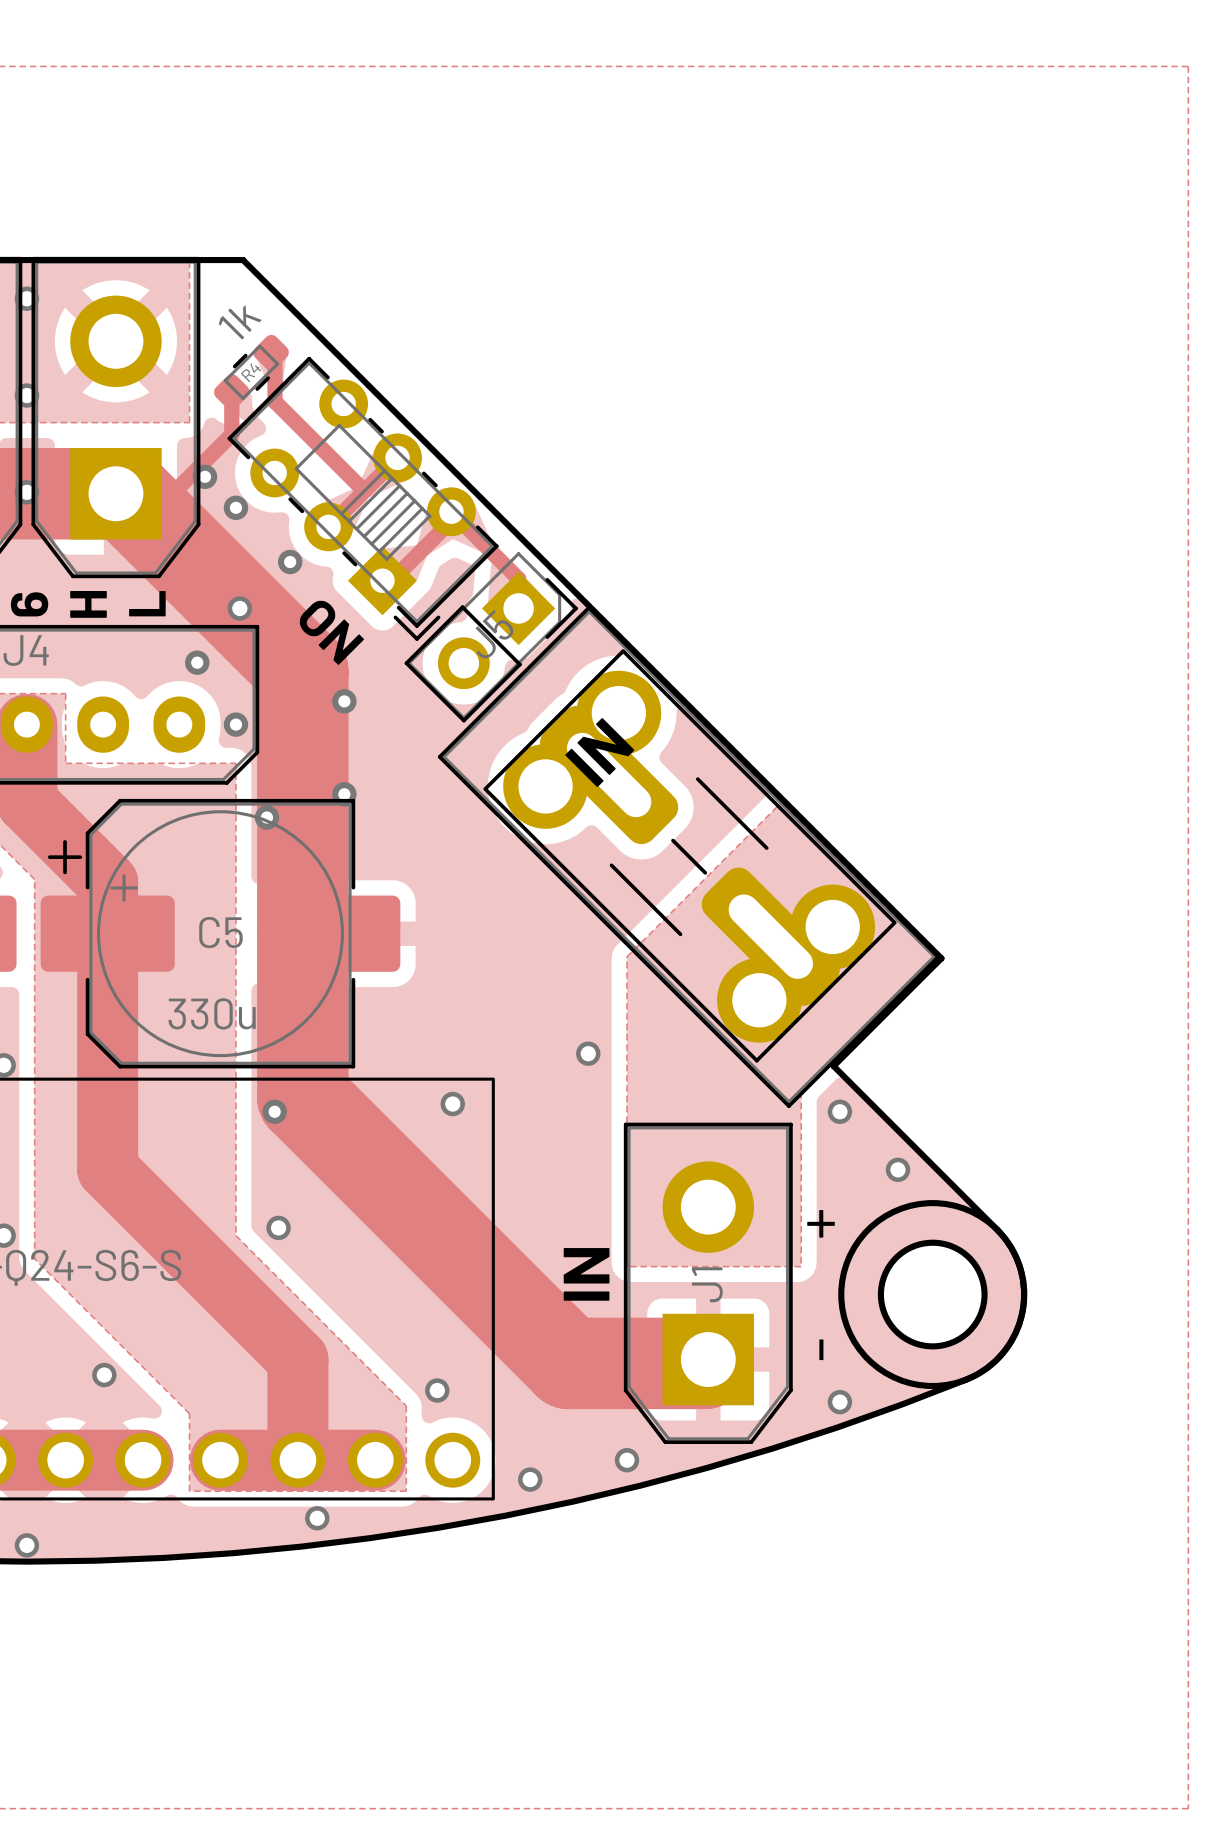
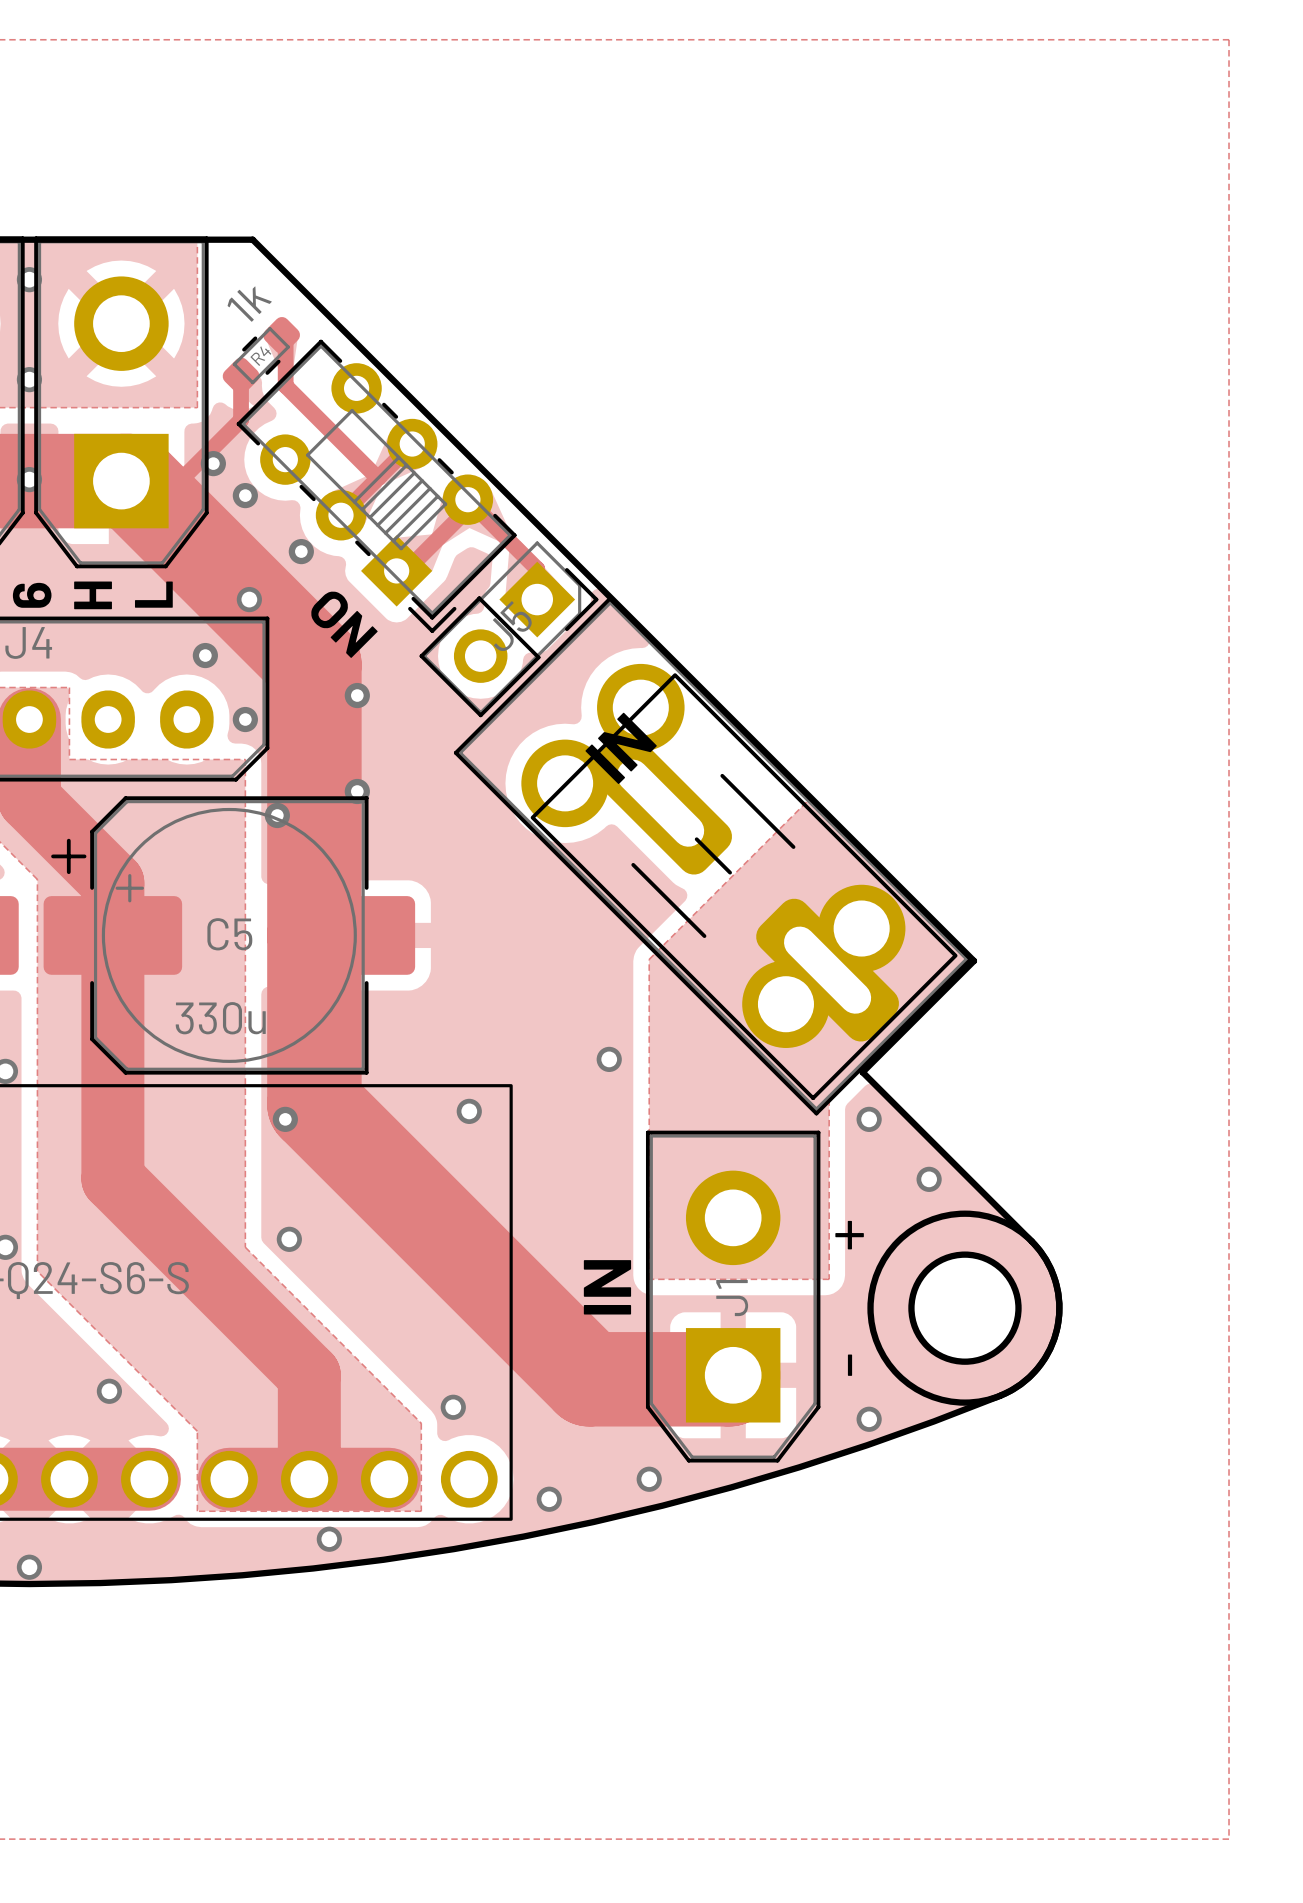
part position: (689, 855) -> (744, 886)

